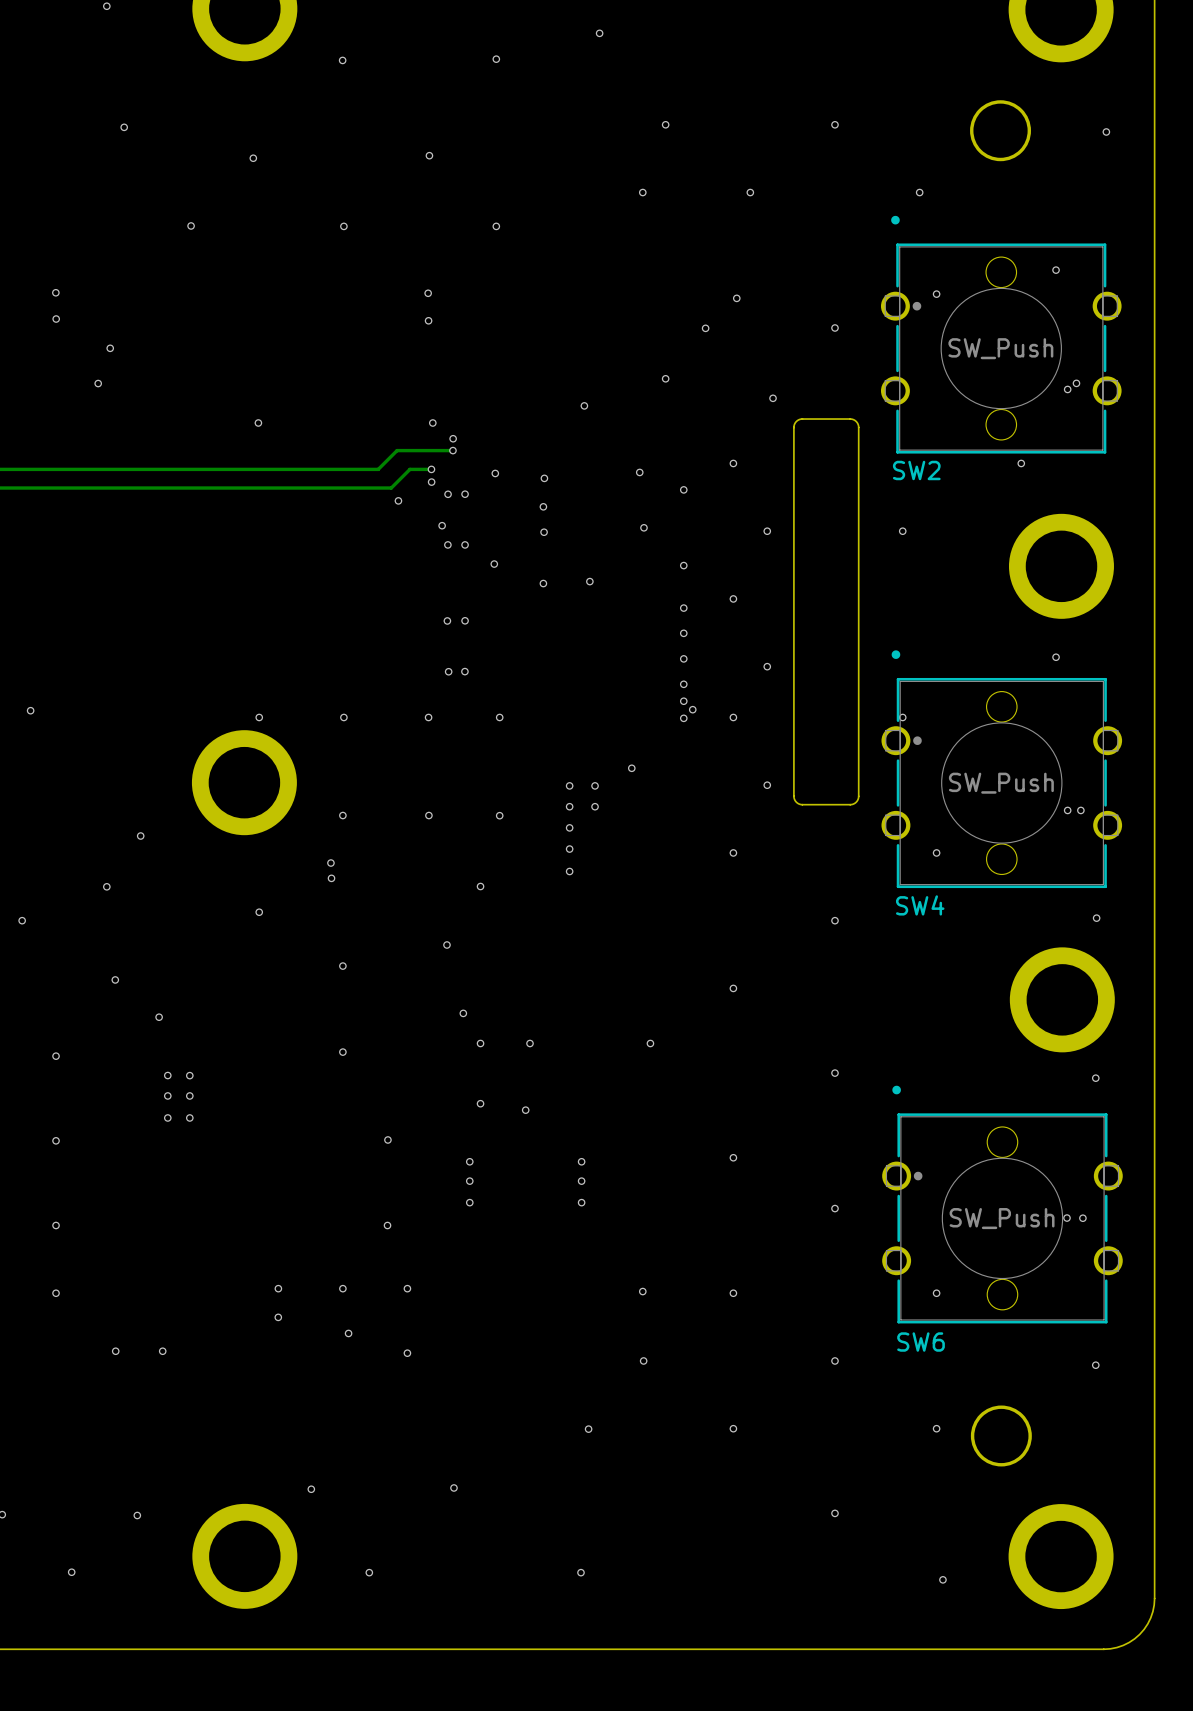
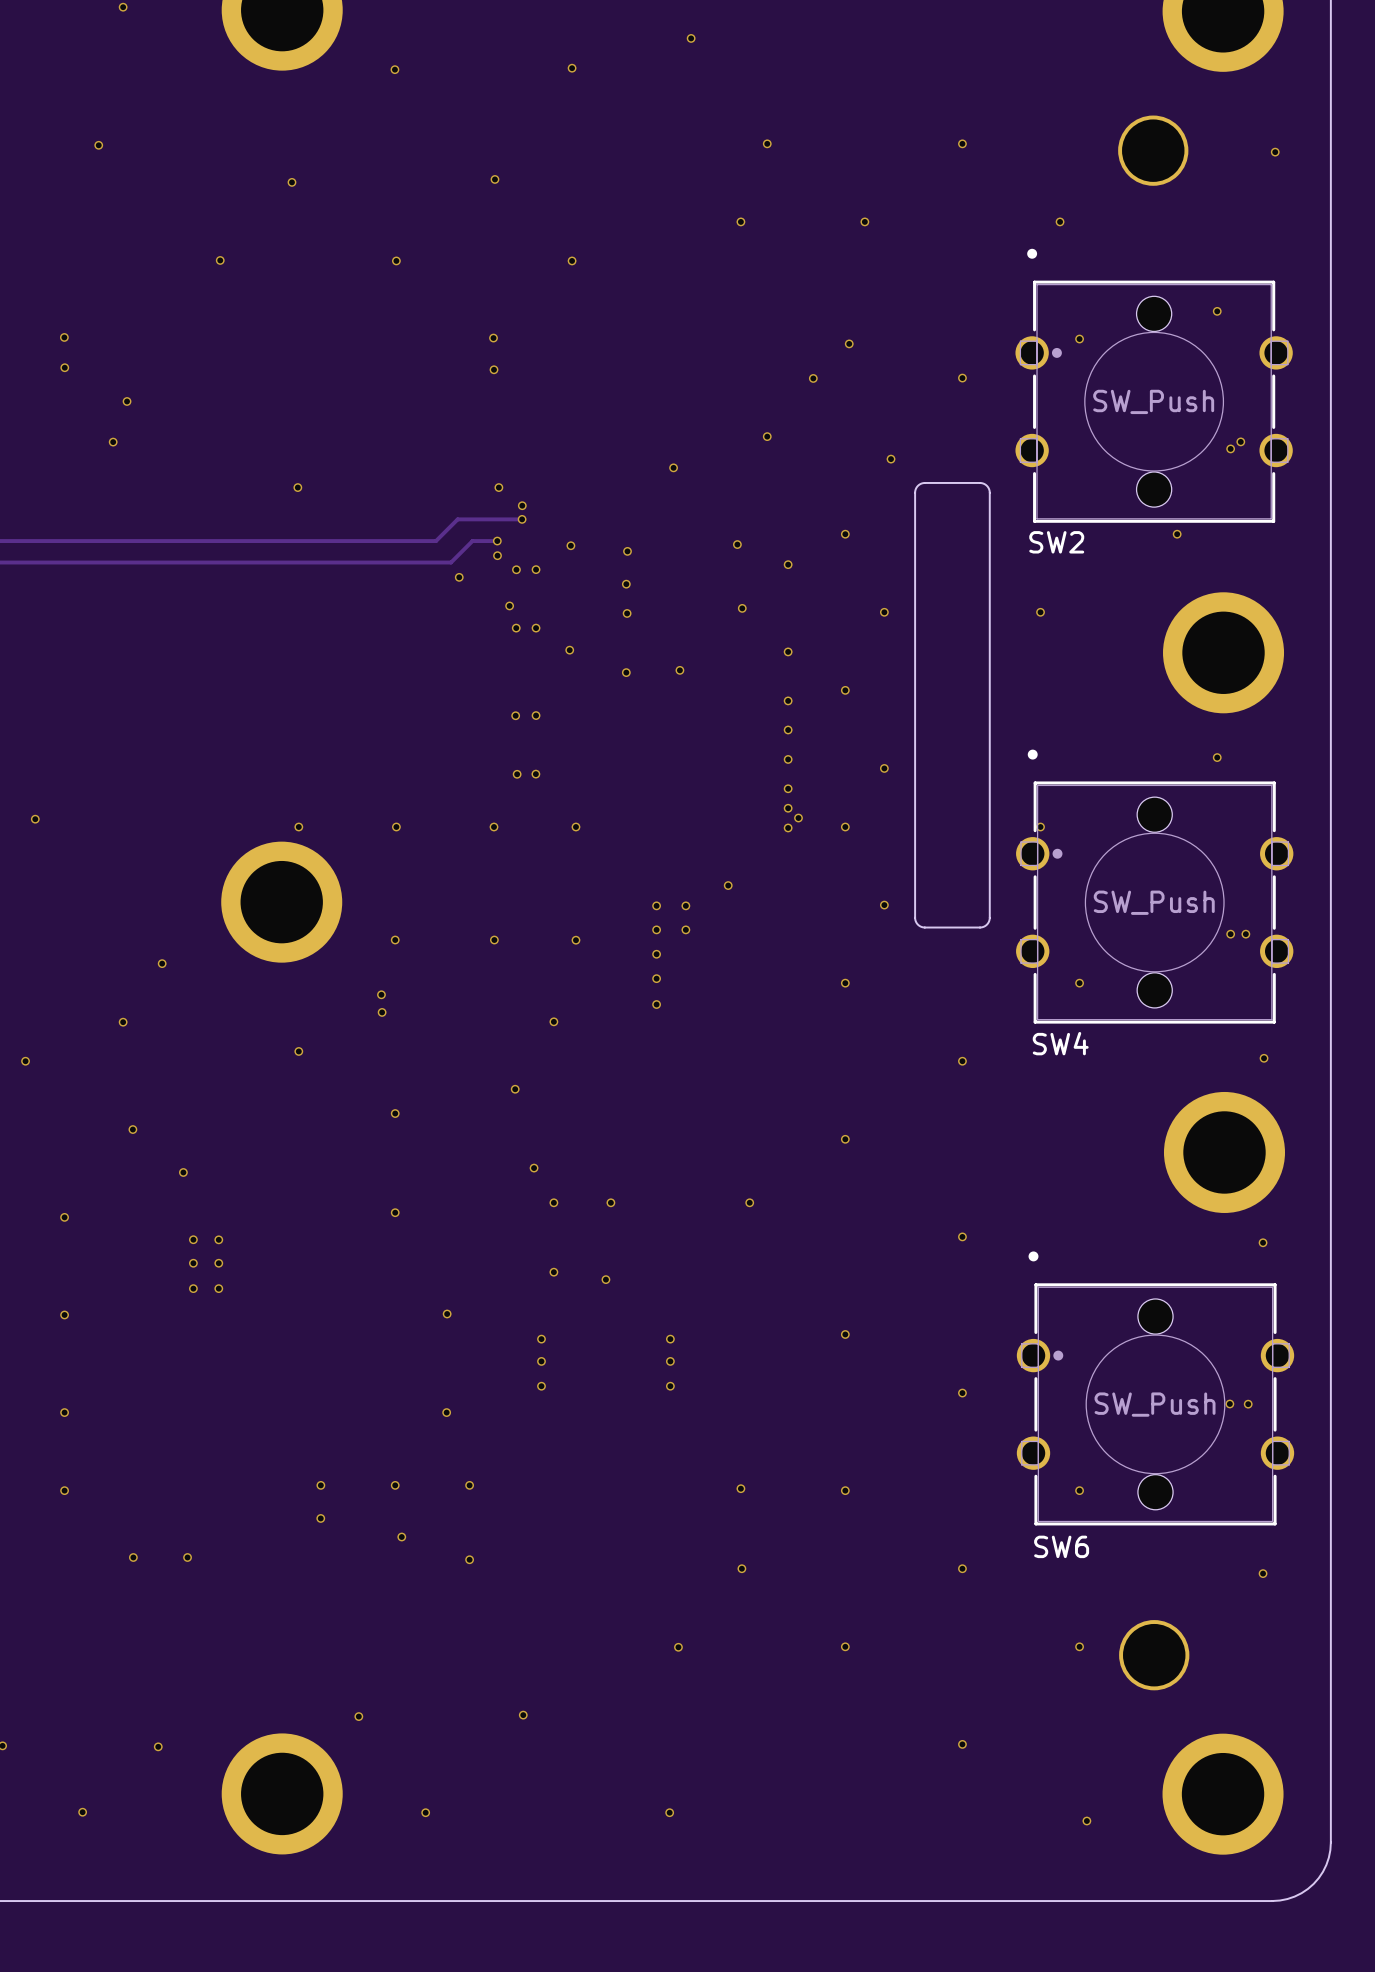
via position: (124, 127) -> (98, 145)

